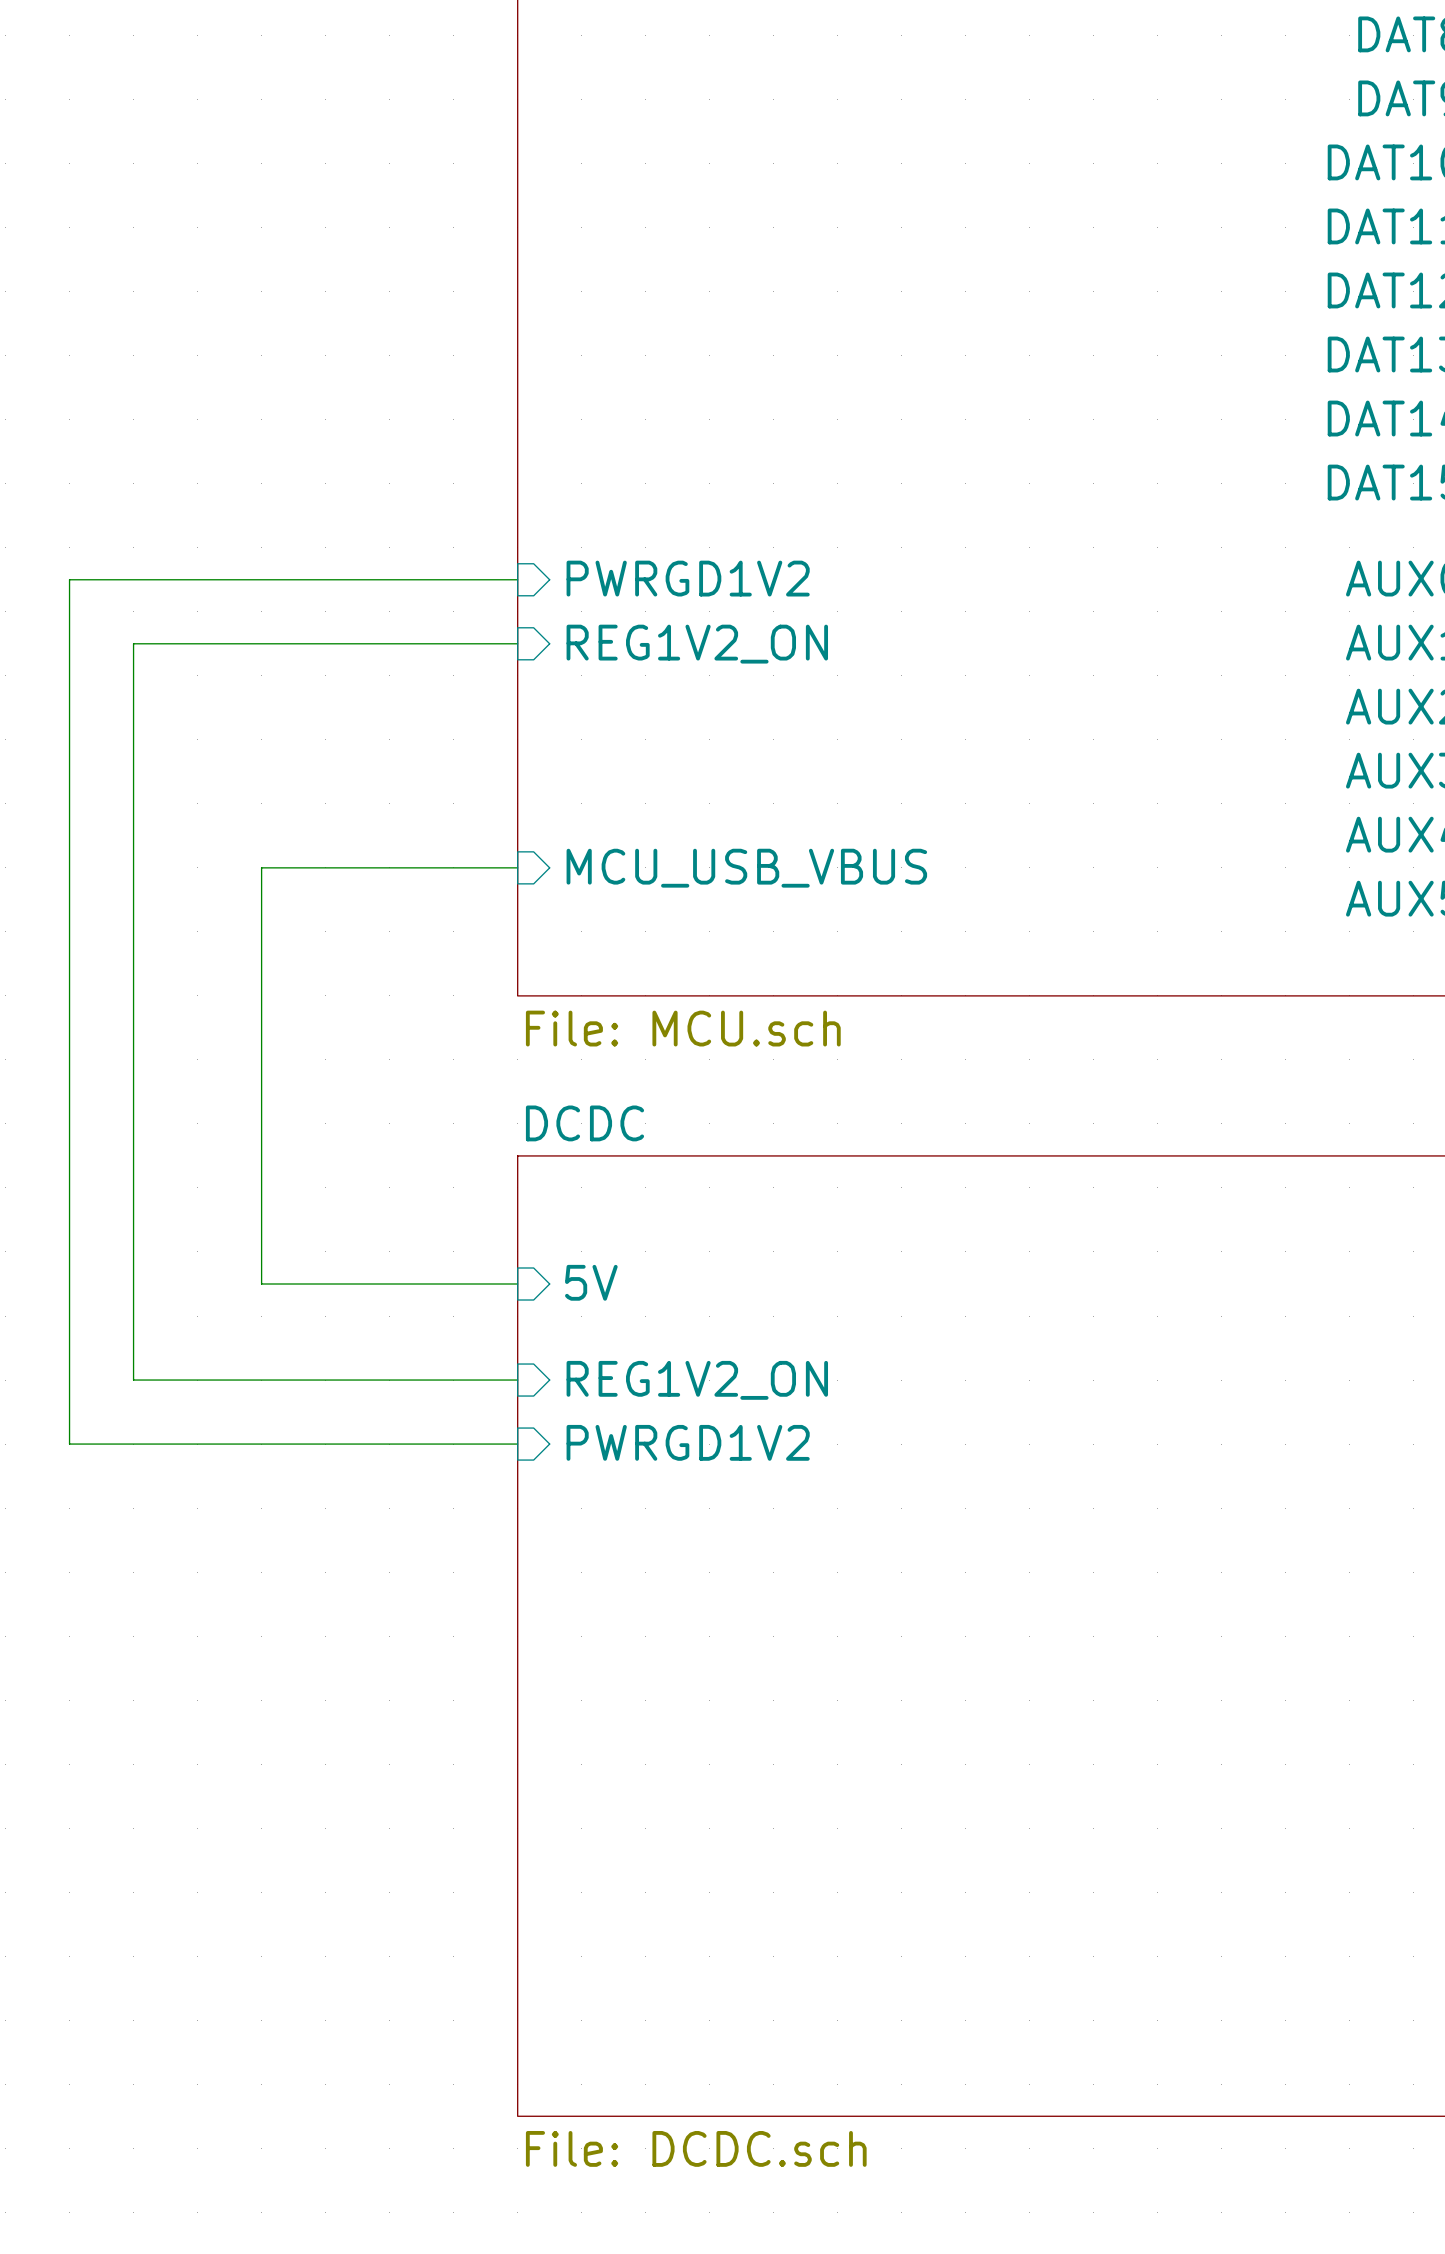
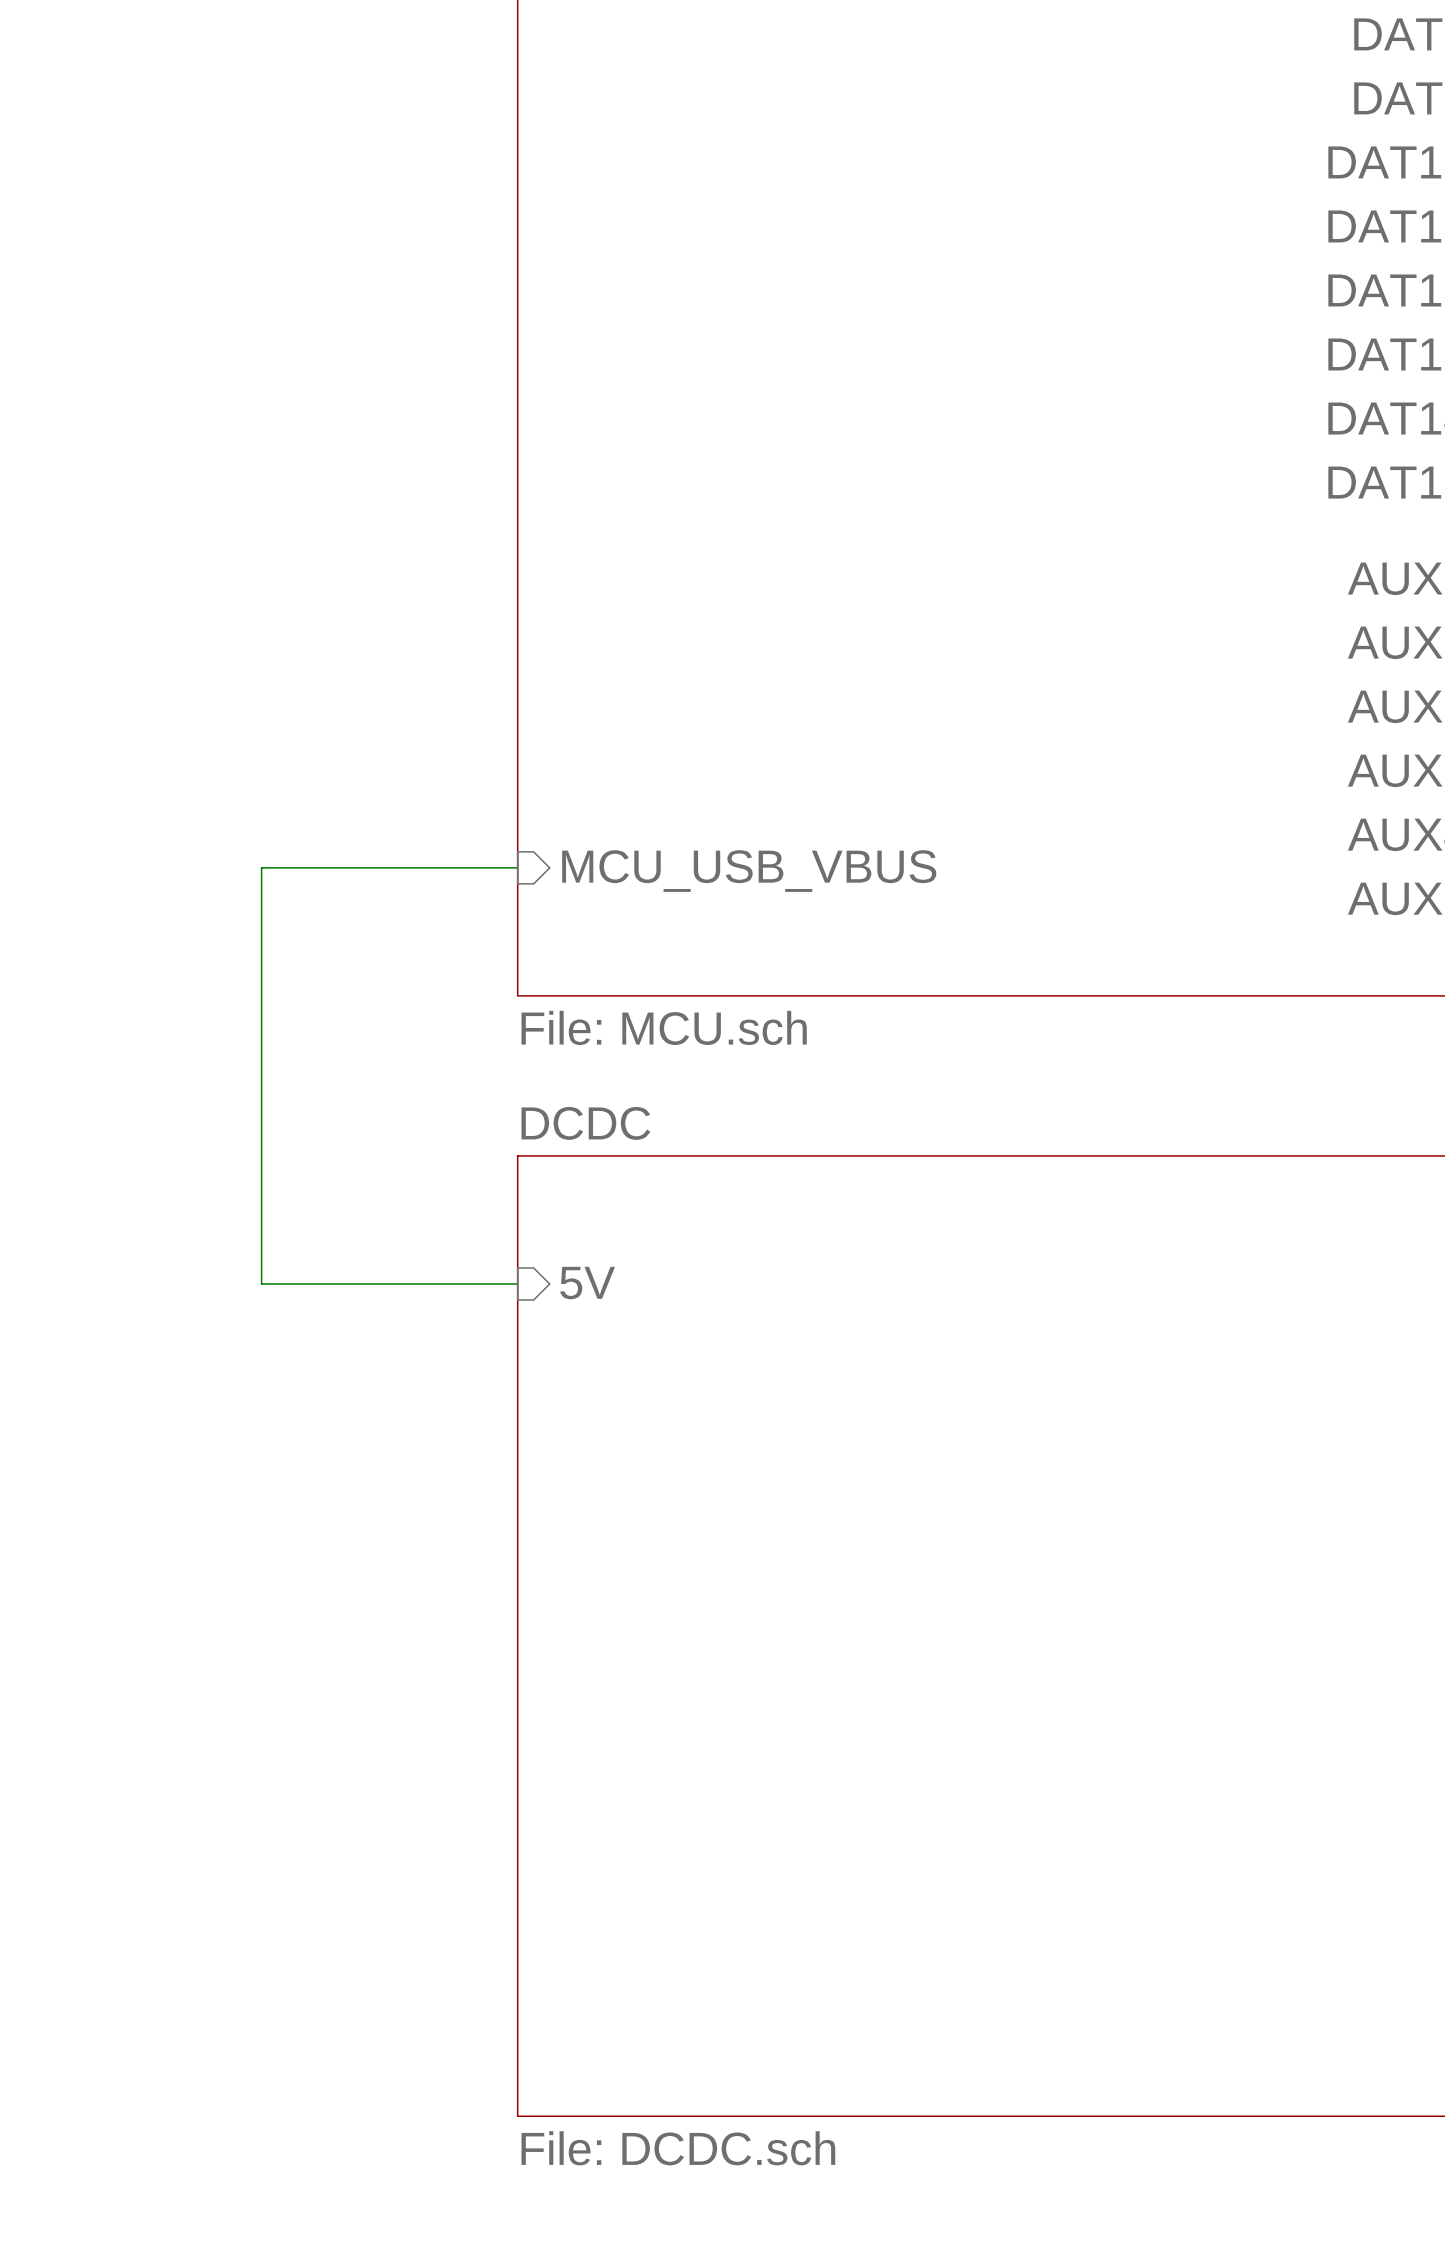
sheet pin: PWRGD1V2 (688, 578) -> none
wire: (517, 579) (69, 579) (69, 1444) (517, 1444) -> none
wire: (517, 643) (133, 643) (133, 1380) (517, 1380) -> none
sheet pin: REG1V2_ON (697, 644) -> none
sheet pin: REG1V2_ON (697, 1380) -> none
sheet pin: PWRGD1V2 (688, 1442) -> none

